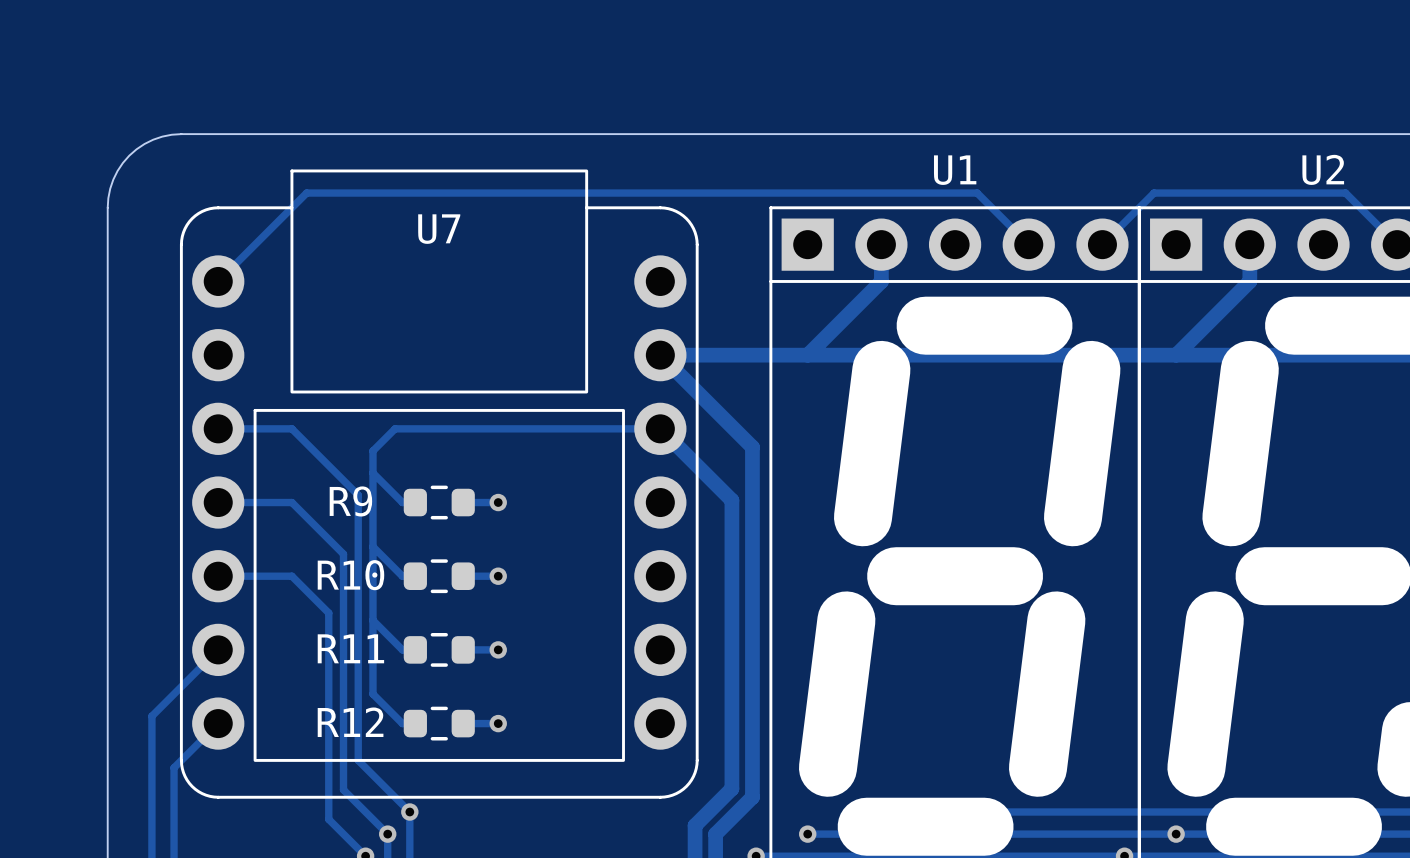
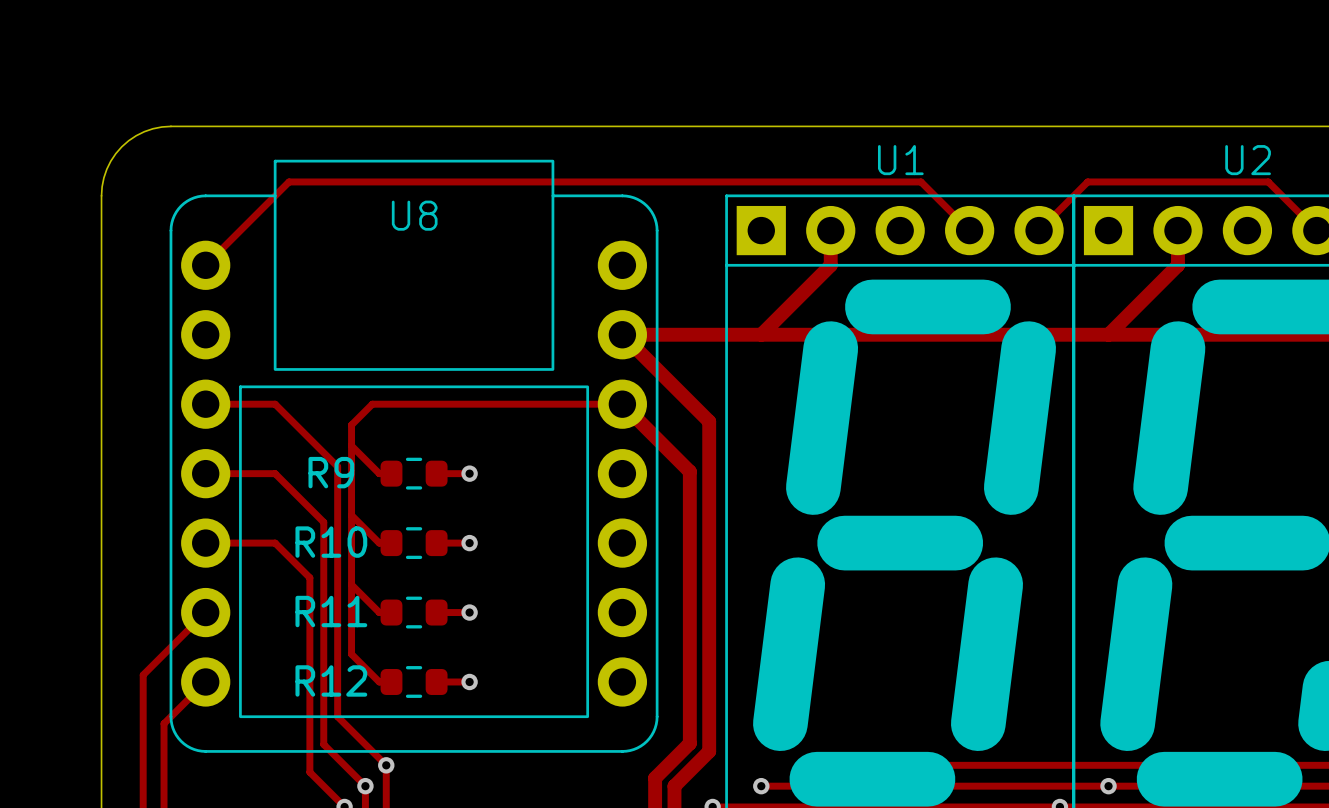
U7 name: U7 (439, 229) -> U8 (414, 215)

